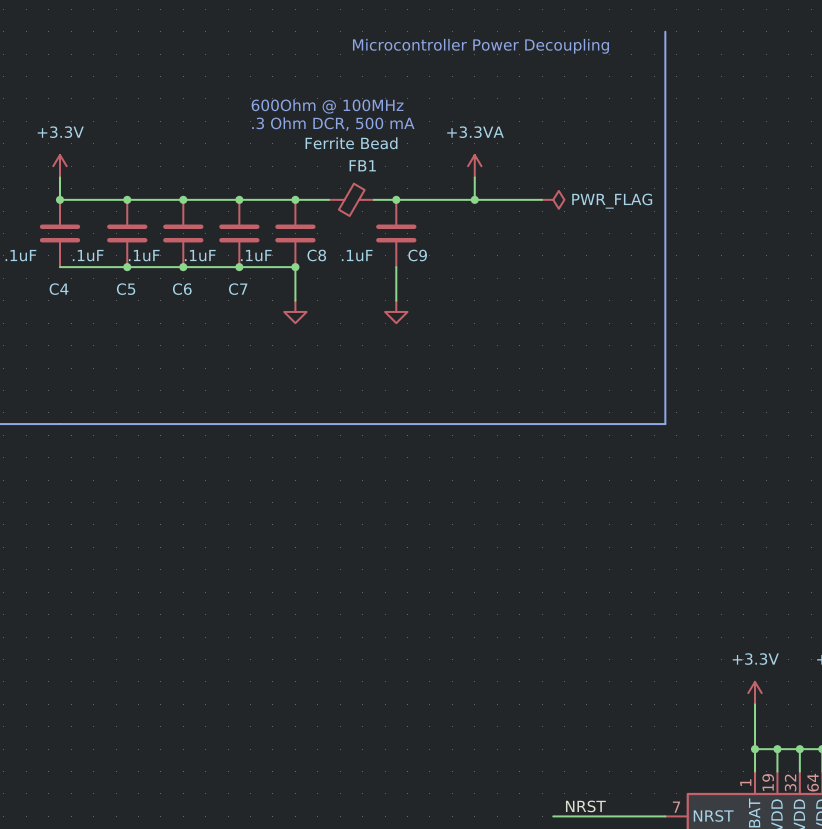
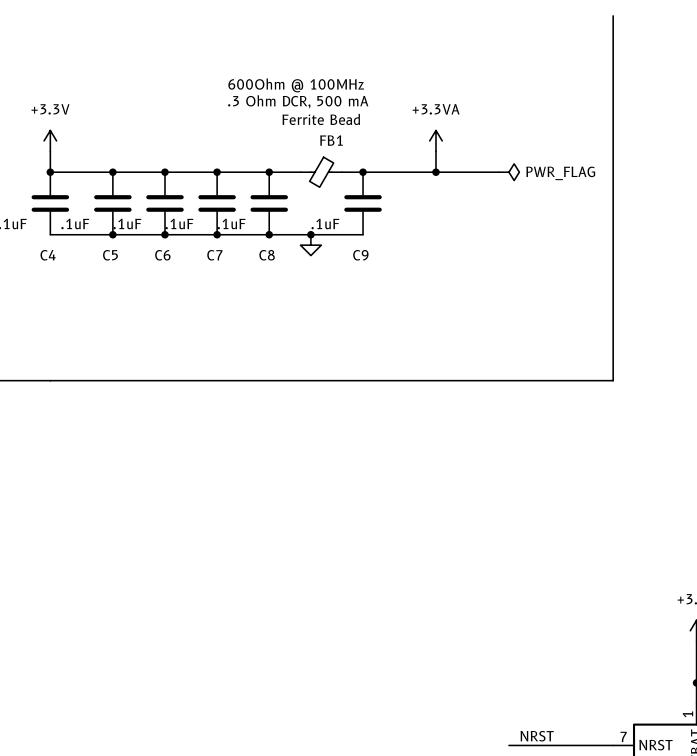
text: Microcontroller Power Decoupling (480, 46) -> none
C8 name position: C8 (316, 255) -> C8 (267, 255)
C9 name position: C9 (417, 255) -> C9 (360, 255)
wire: (295, 267) (295, 300) -> (269, 234) (363, 234)
junction: none -> (310, 234)
wire: (396, 267) (396, 300) -> none
power symbol: none -> (310, 245)
power symbol: (295, 311) -> none
power symbol: (396, 311) -> none

